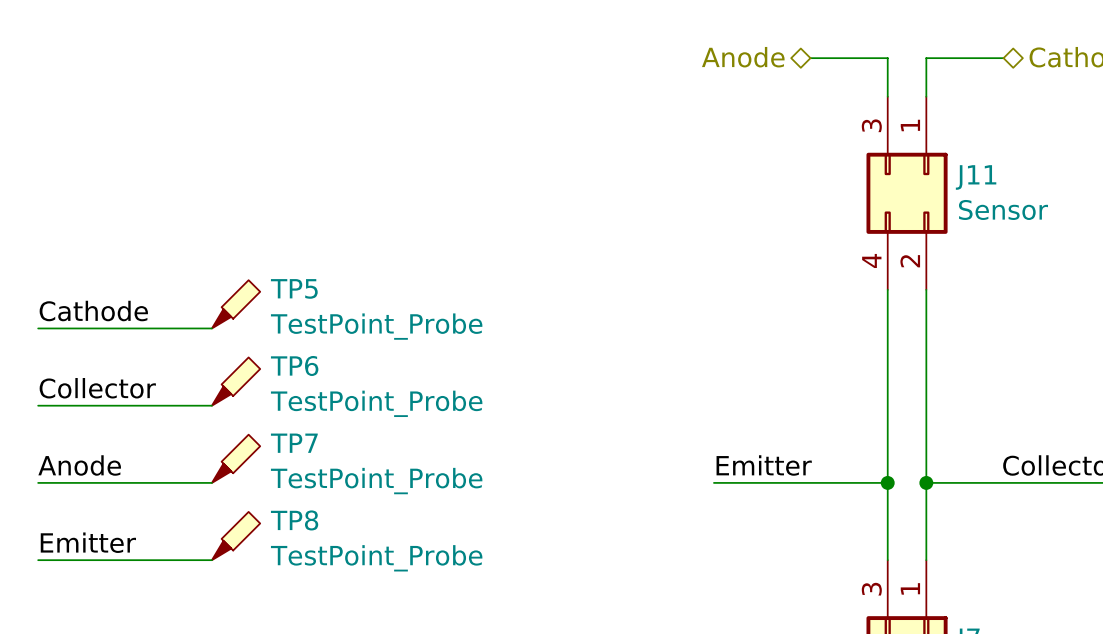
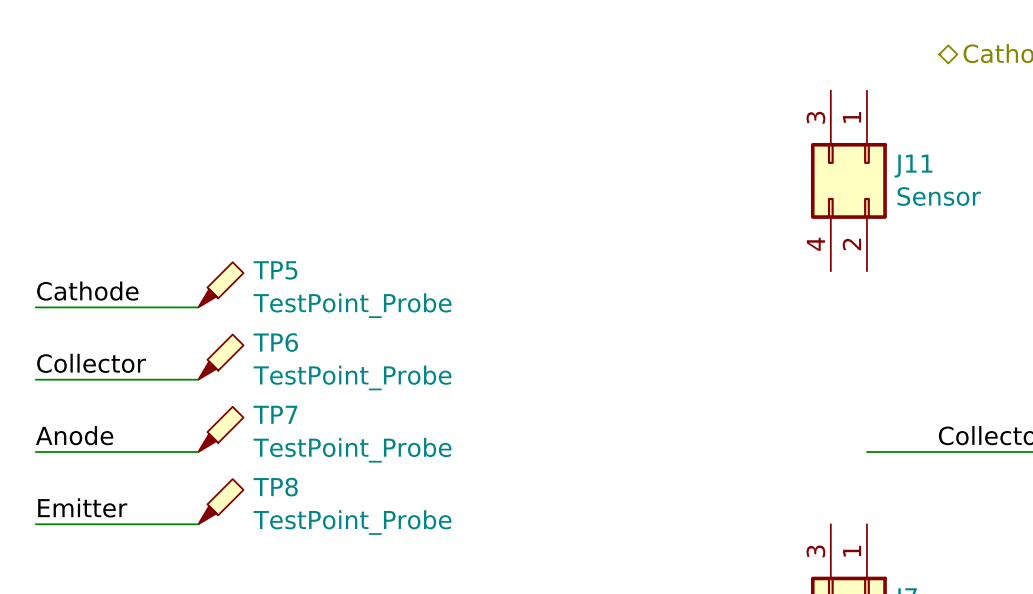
hierarchical label: Anode (743, 57) -> none
wire: (810, 58) (887, 58) (887, 96) -> none
wire: (1003, 58) (926, 58) (926, 96) -> none
wire: (887, 289) (887, 560) -> none
wire: (926, 289) (926, 560) -> none
label: Emitter (764, 465) -> none
wire: (713, 482) (887, 482) -> none
junction: (887, 482) -> none
junction: (926, 482) -> none

